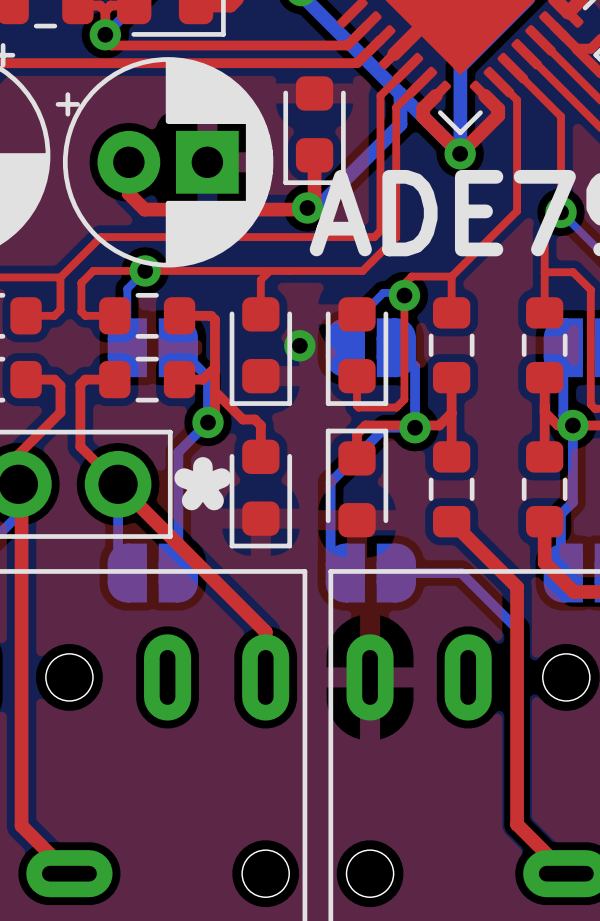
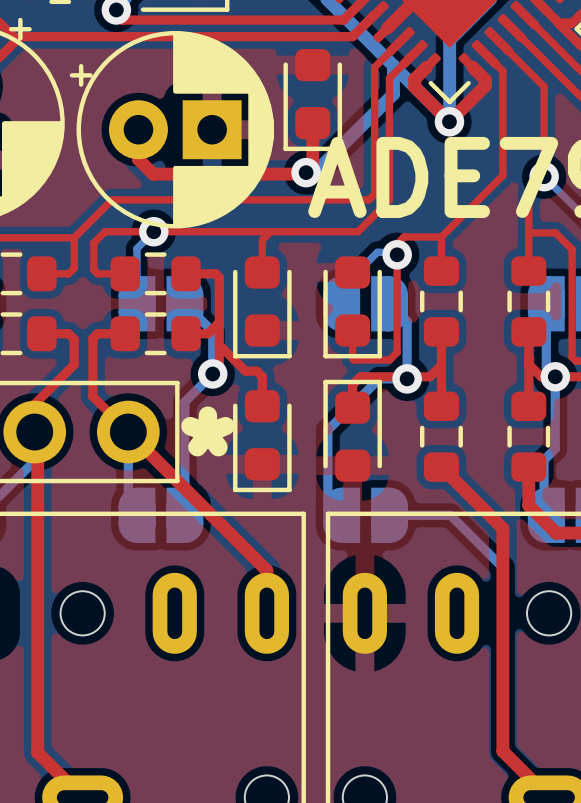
via: (299, 345) -> none

